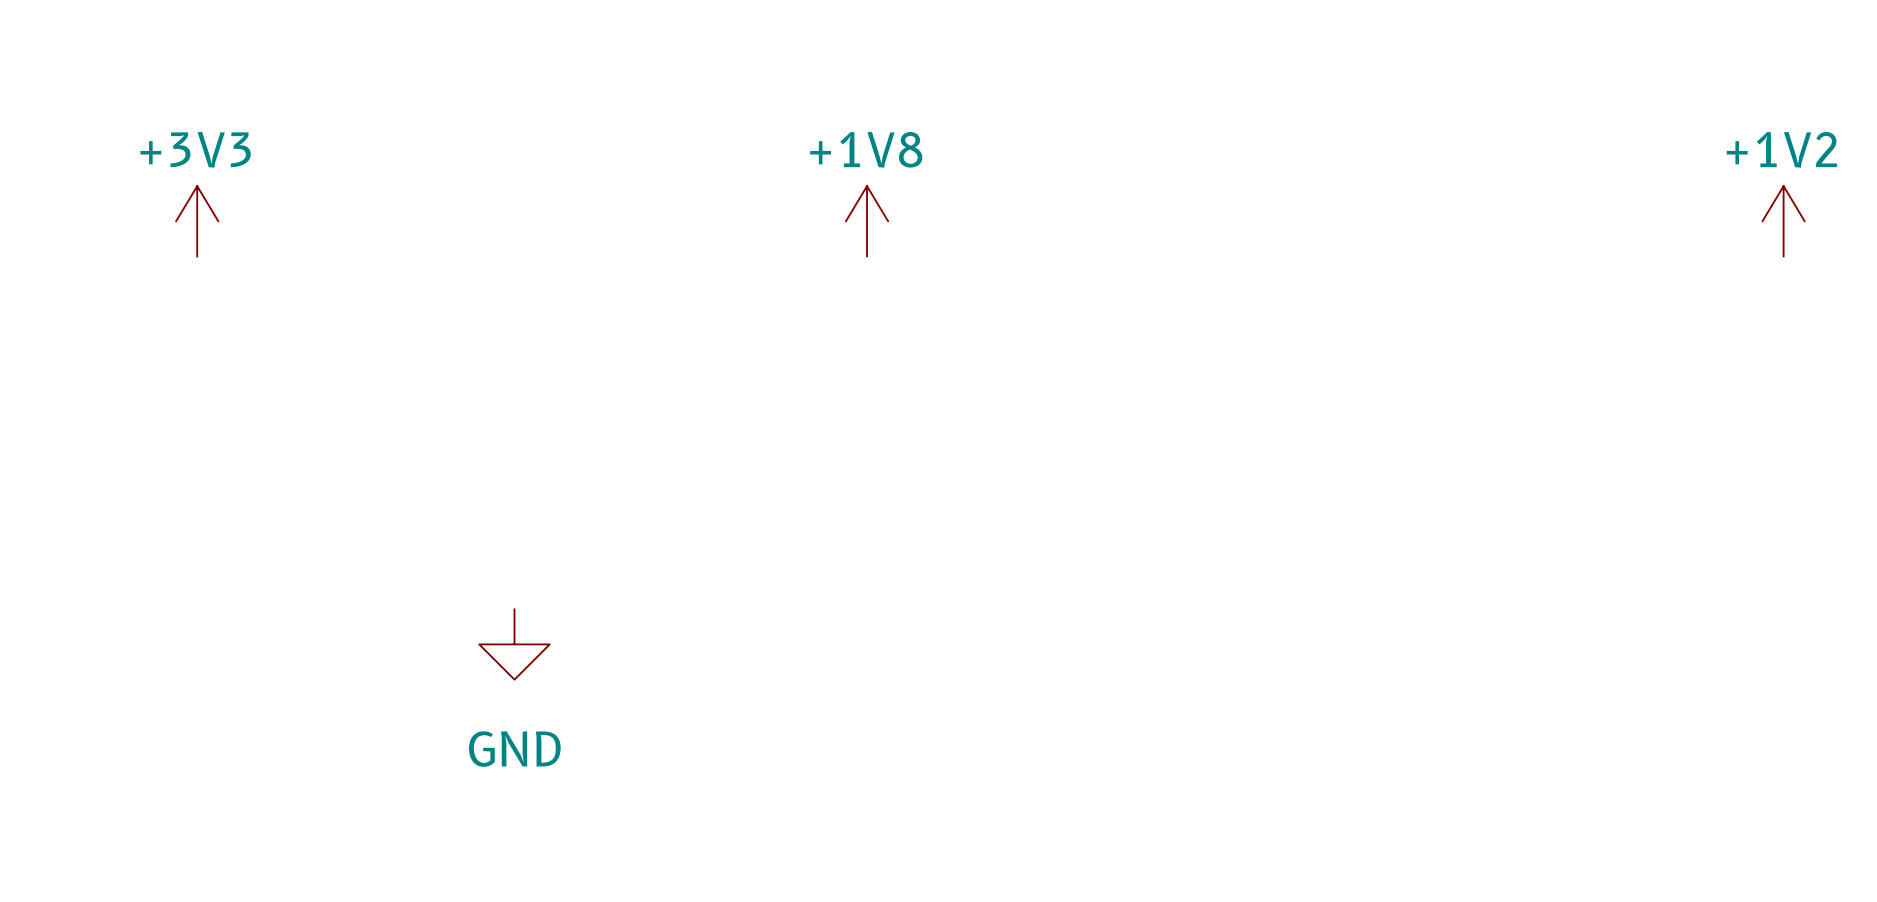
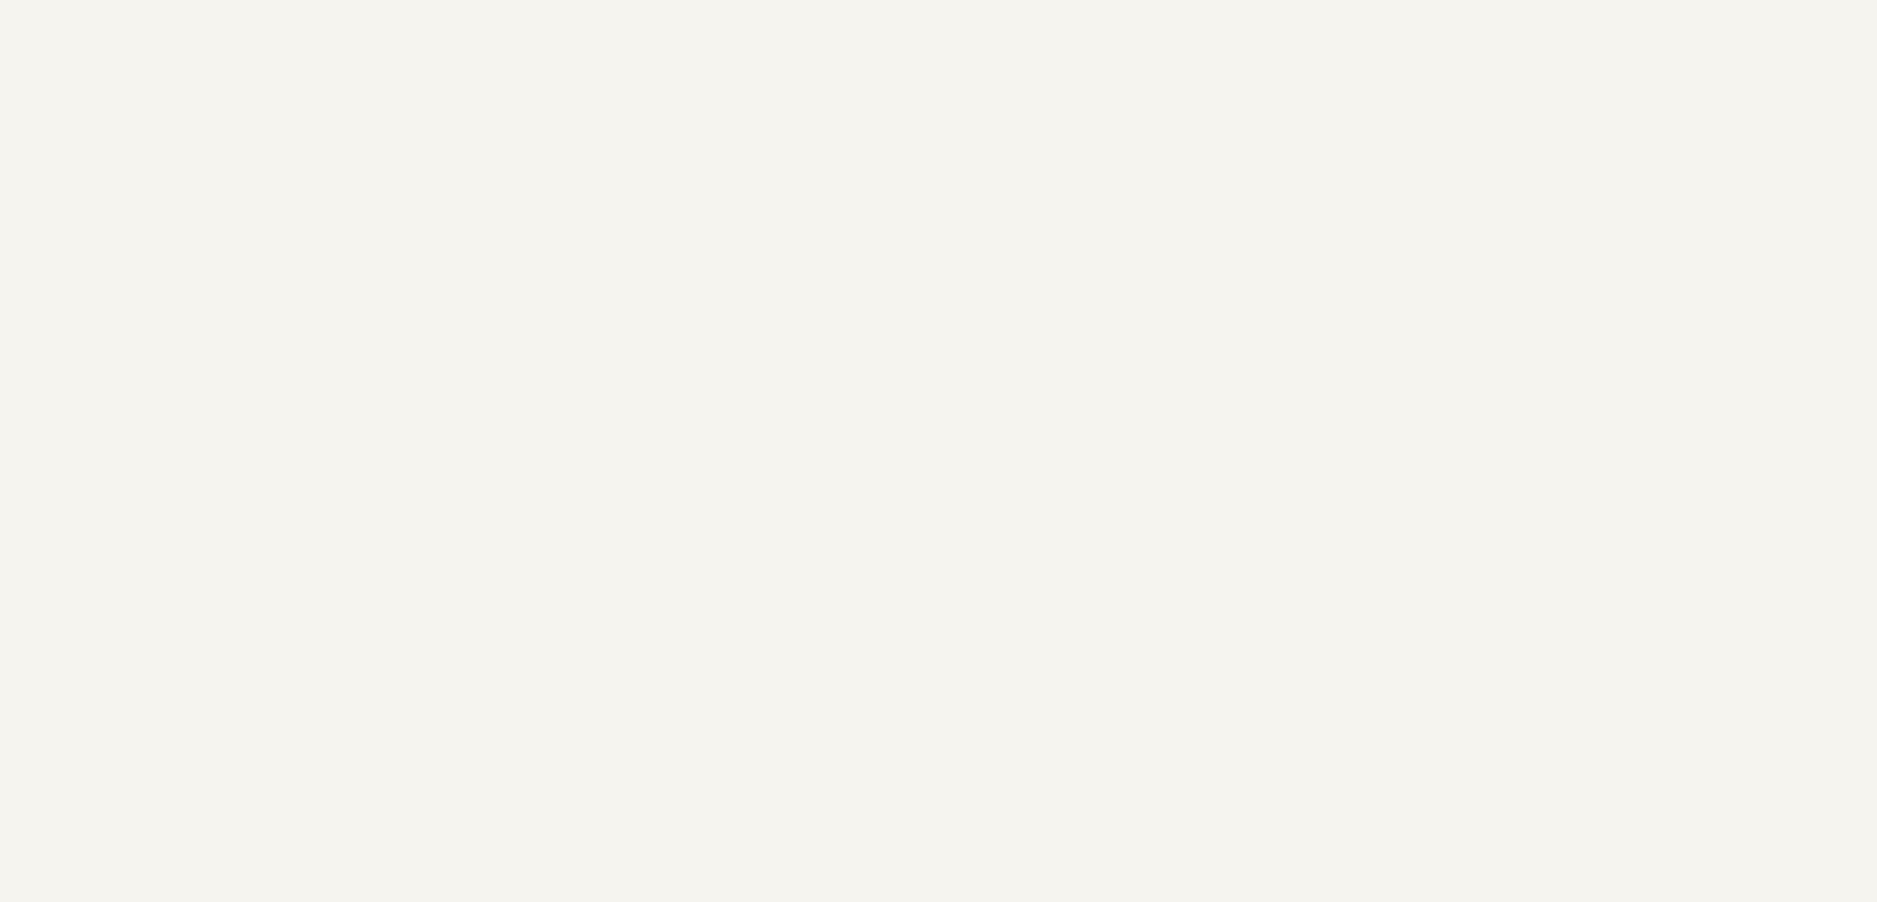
power symbol: +3V3 (197, 221) -> none
power symbol: +1V8 (867, 221) -> none
power symbol: +1V2 (1783, 221) -> none
power symbol: GND (514, 644) -> none

